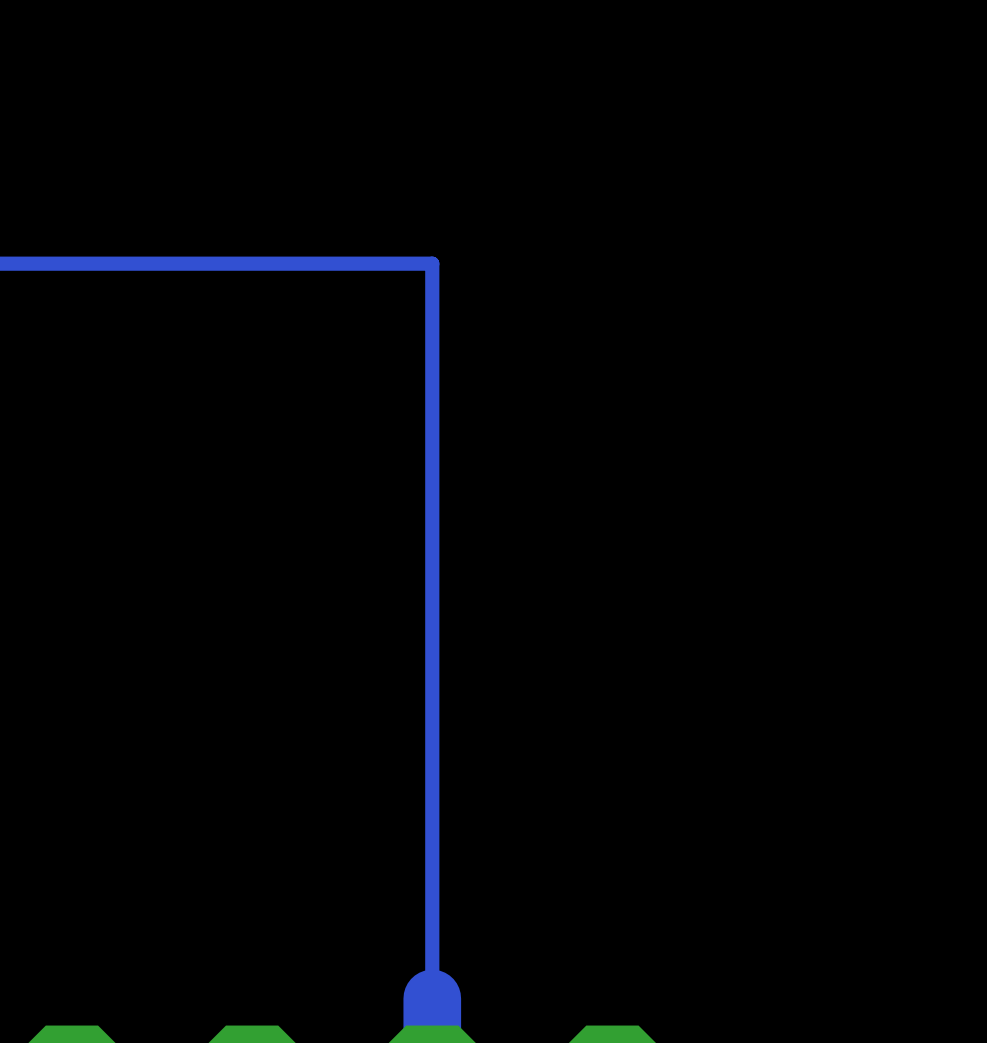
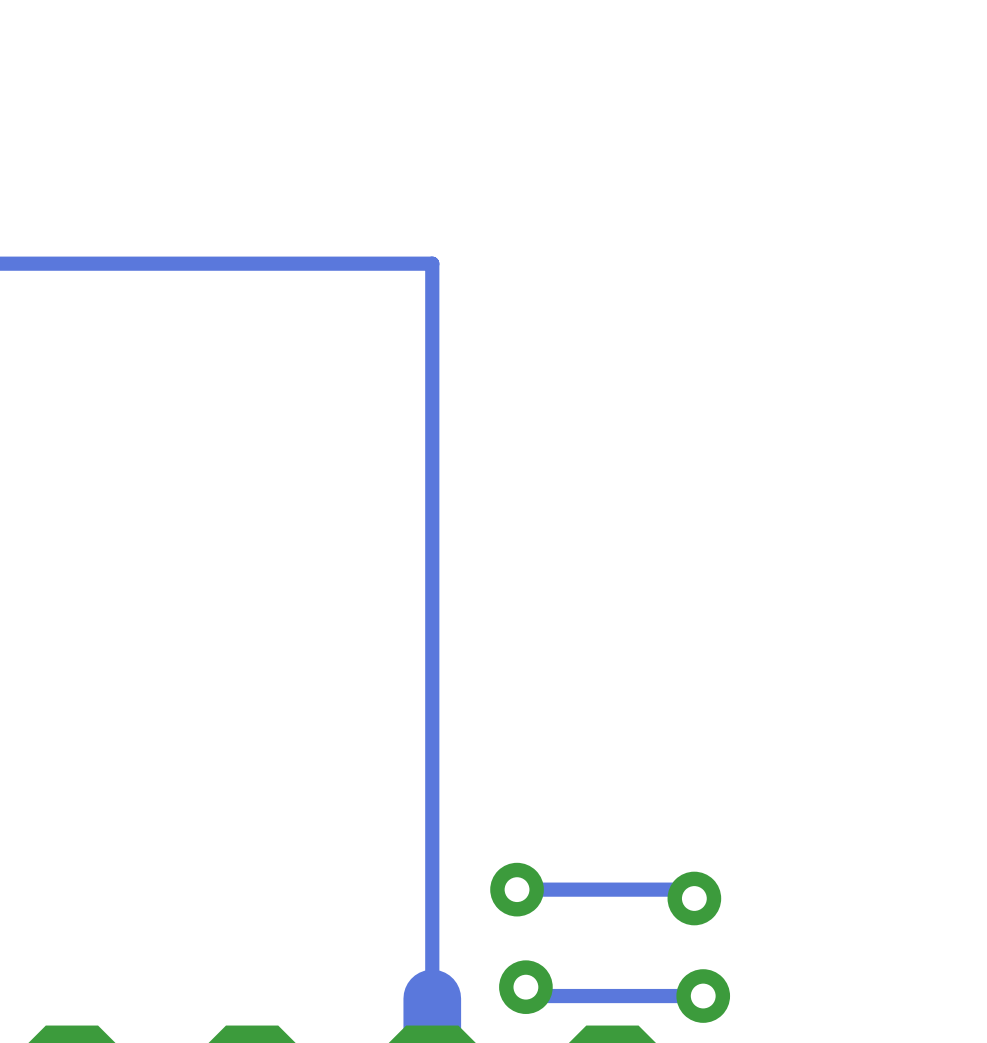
track: none -> (517, 889) (694, 889) (694, 898)
via: none -> (517, 889)
via: none -> (694, 898)
track: none -> (525, 987) (543, 987) (543, 996) (703, 996)
via: none -> (525, 987)
via: none -> (703, 996)

